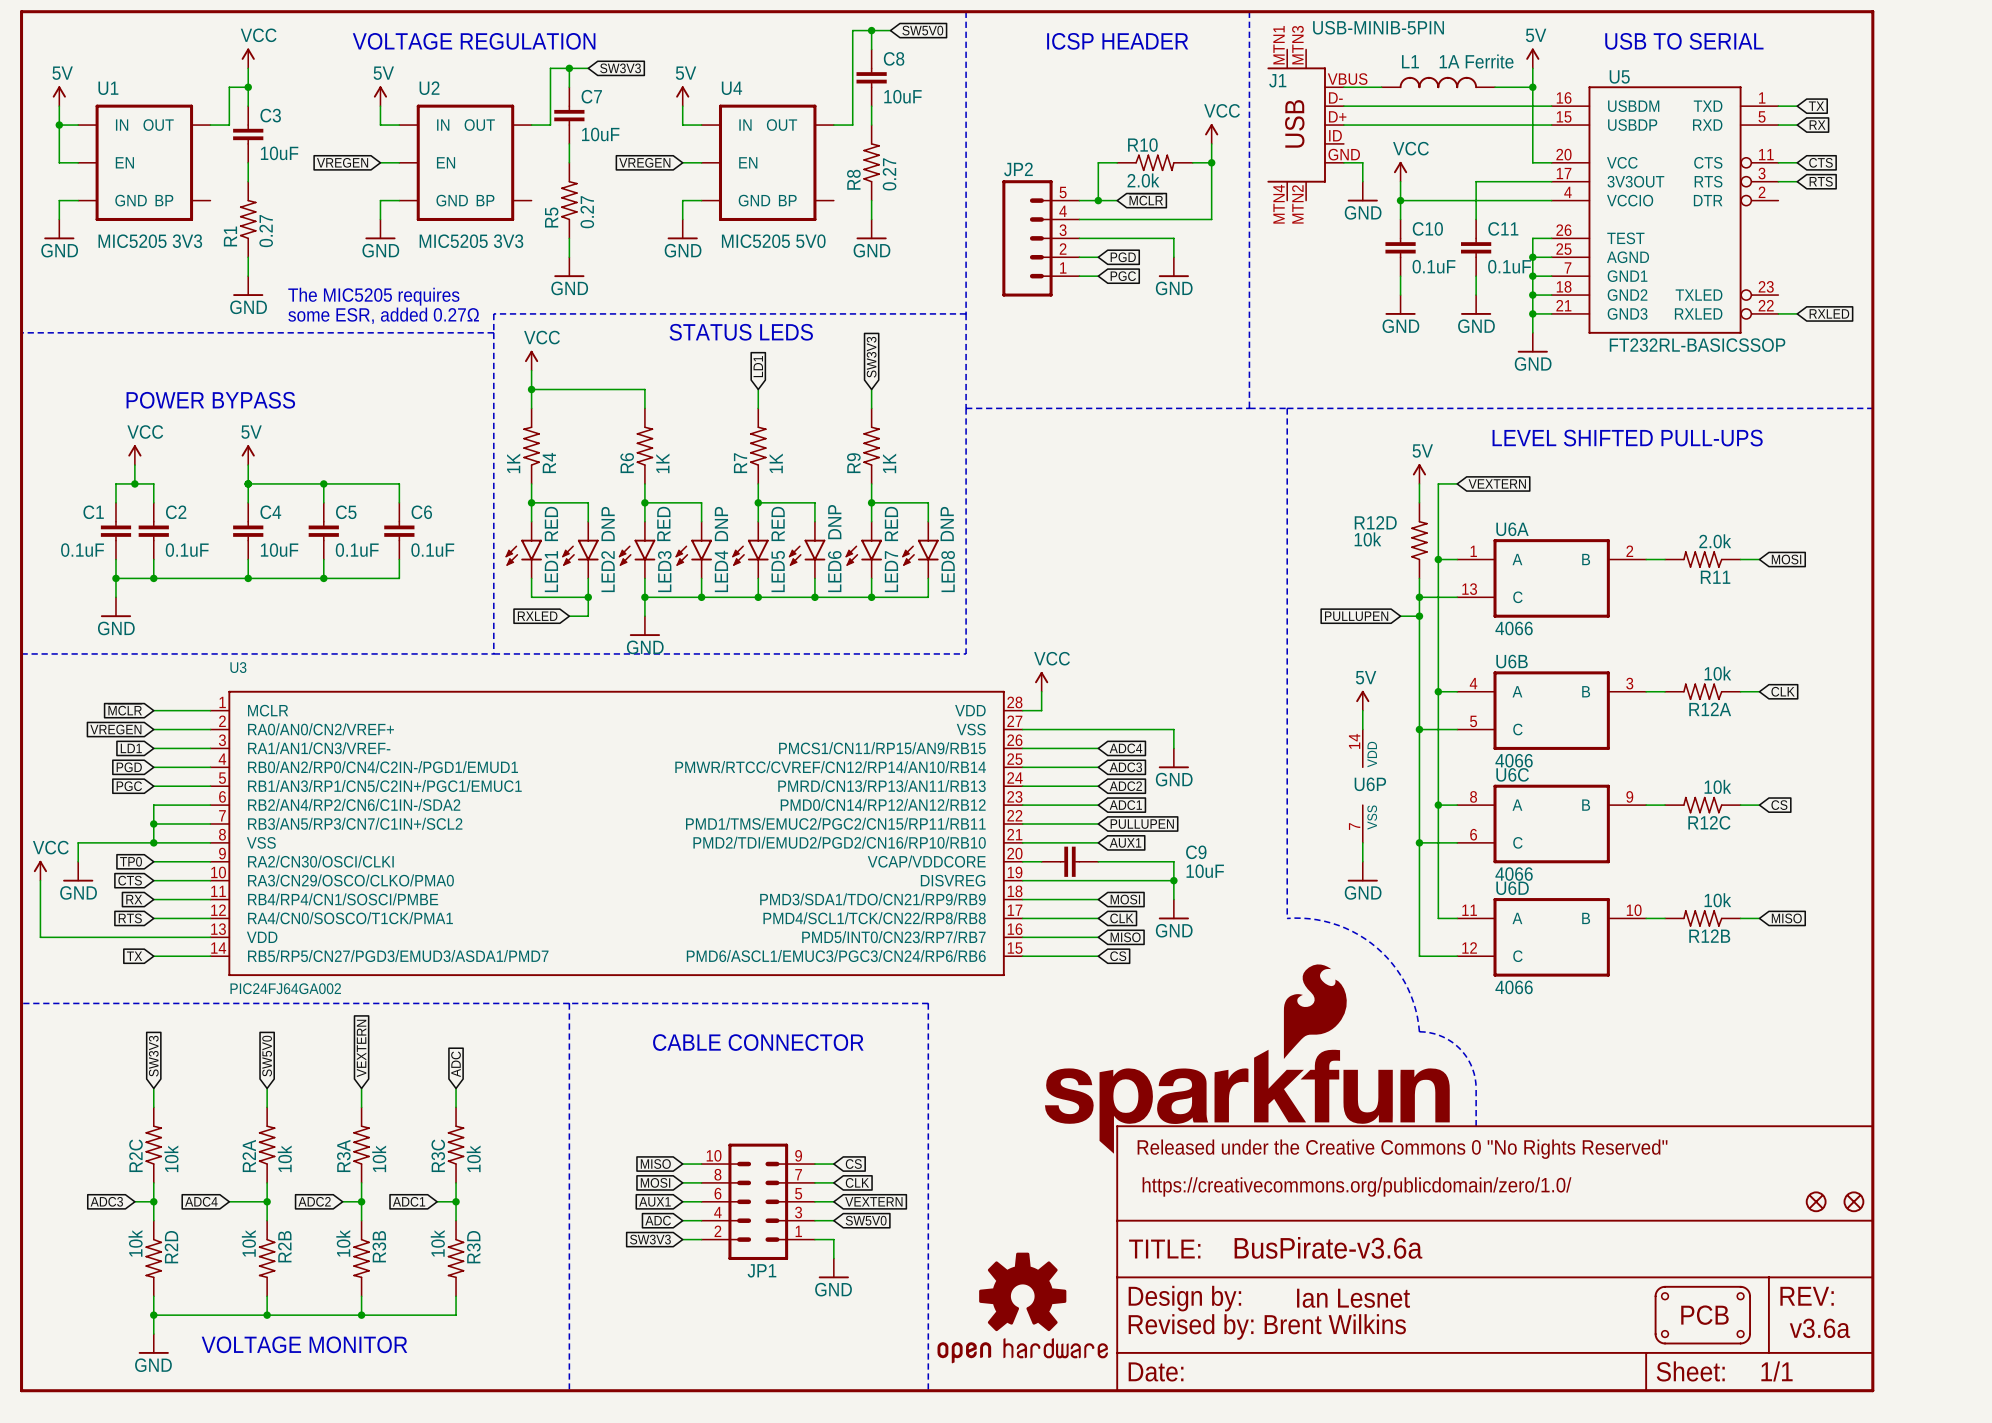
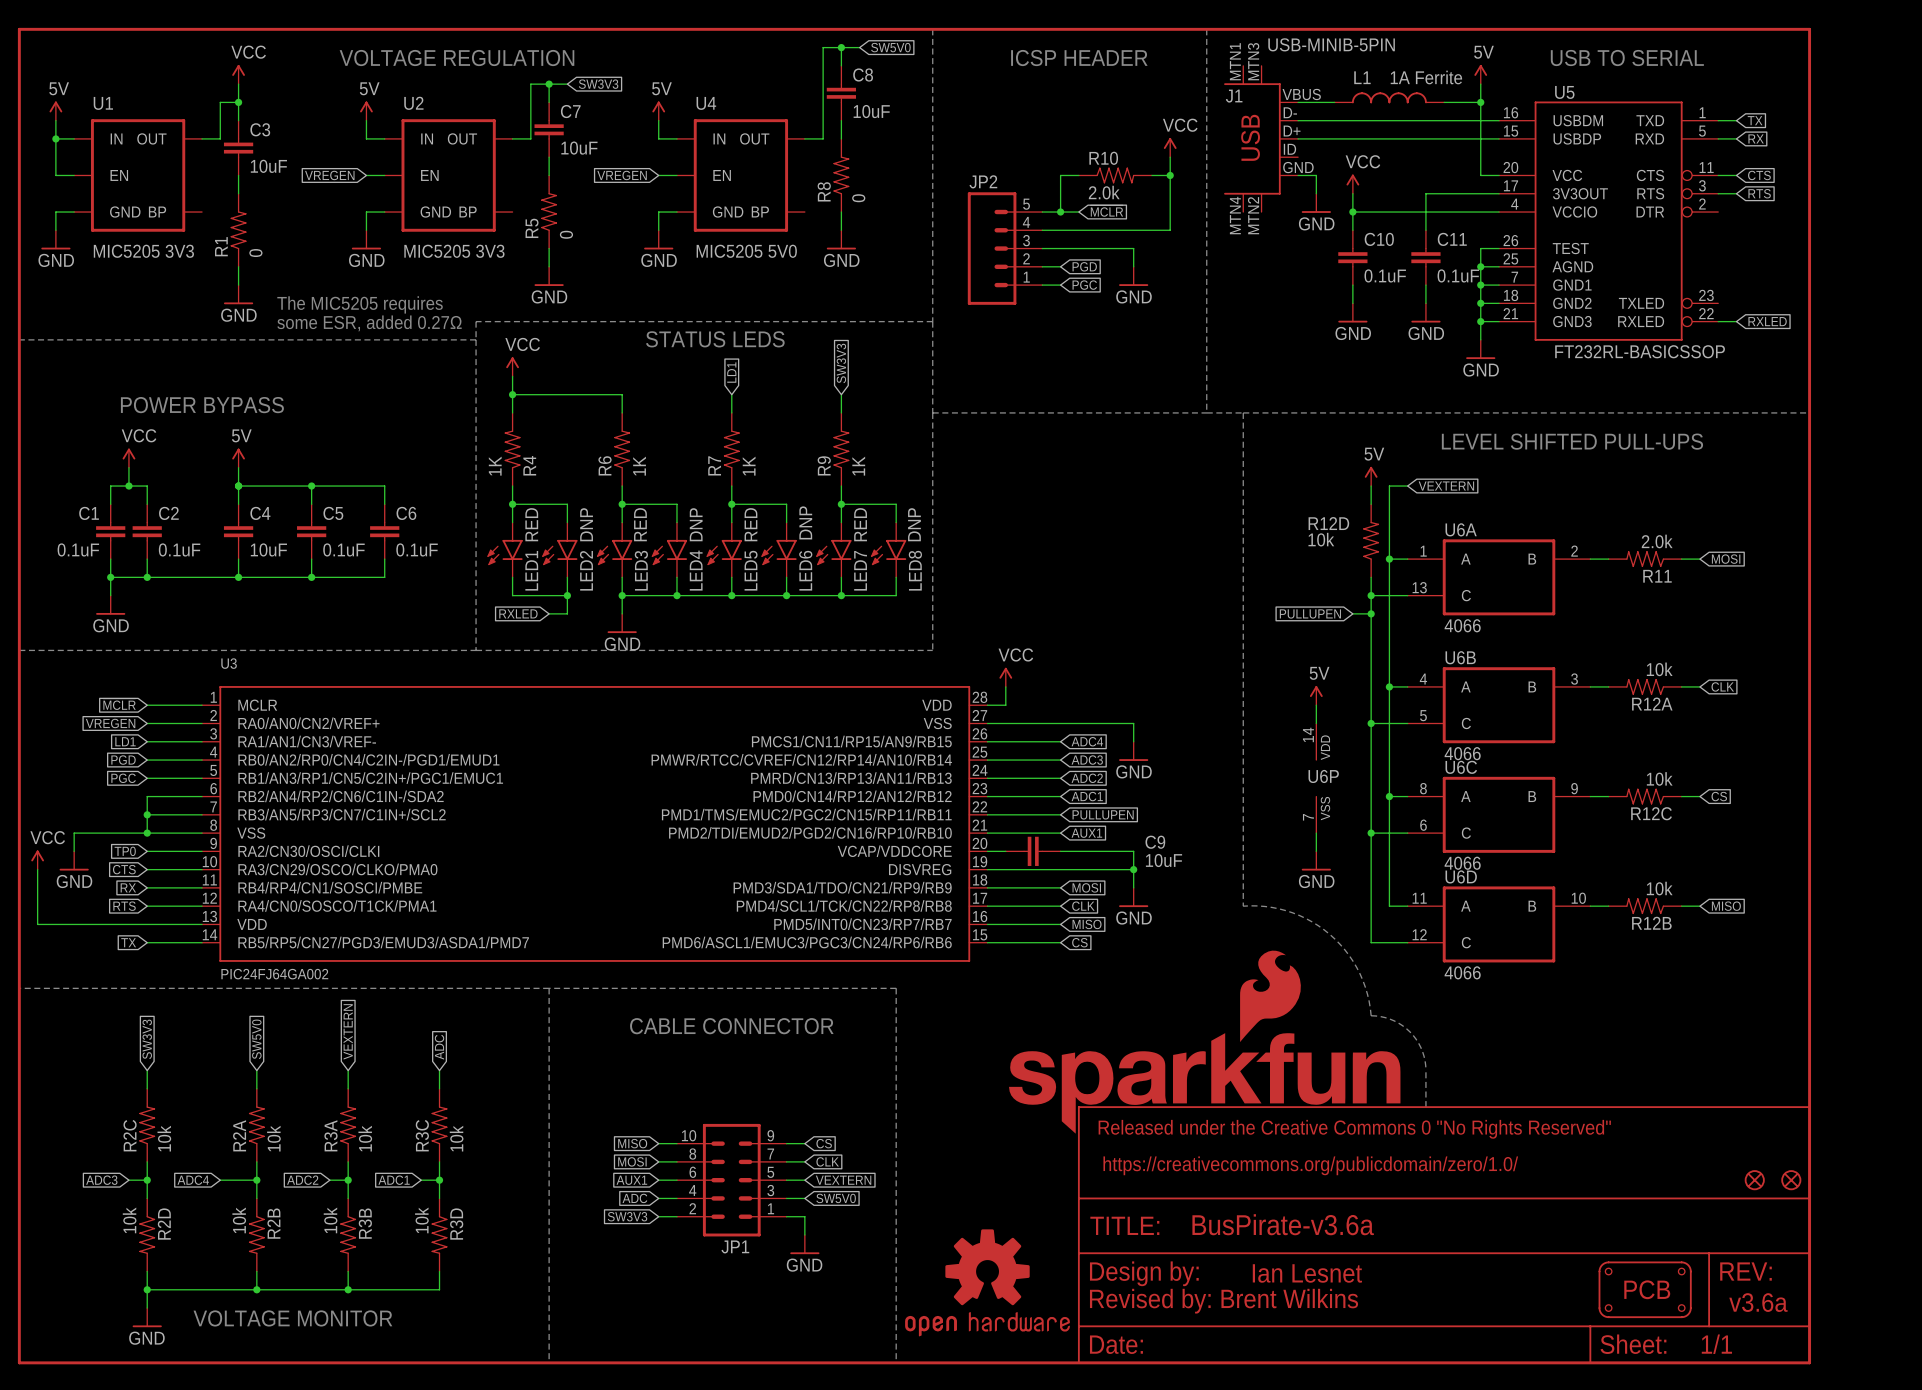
R8 value: 0.27 (889, 174) -> 0 (858, 198)
R5 value: 0.27 (587, 212) -> 0 (566, 234)
R1 value: 0.27 (266, 231) -> 0 (255, 253)

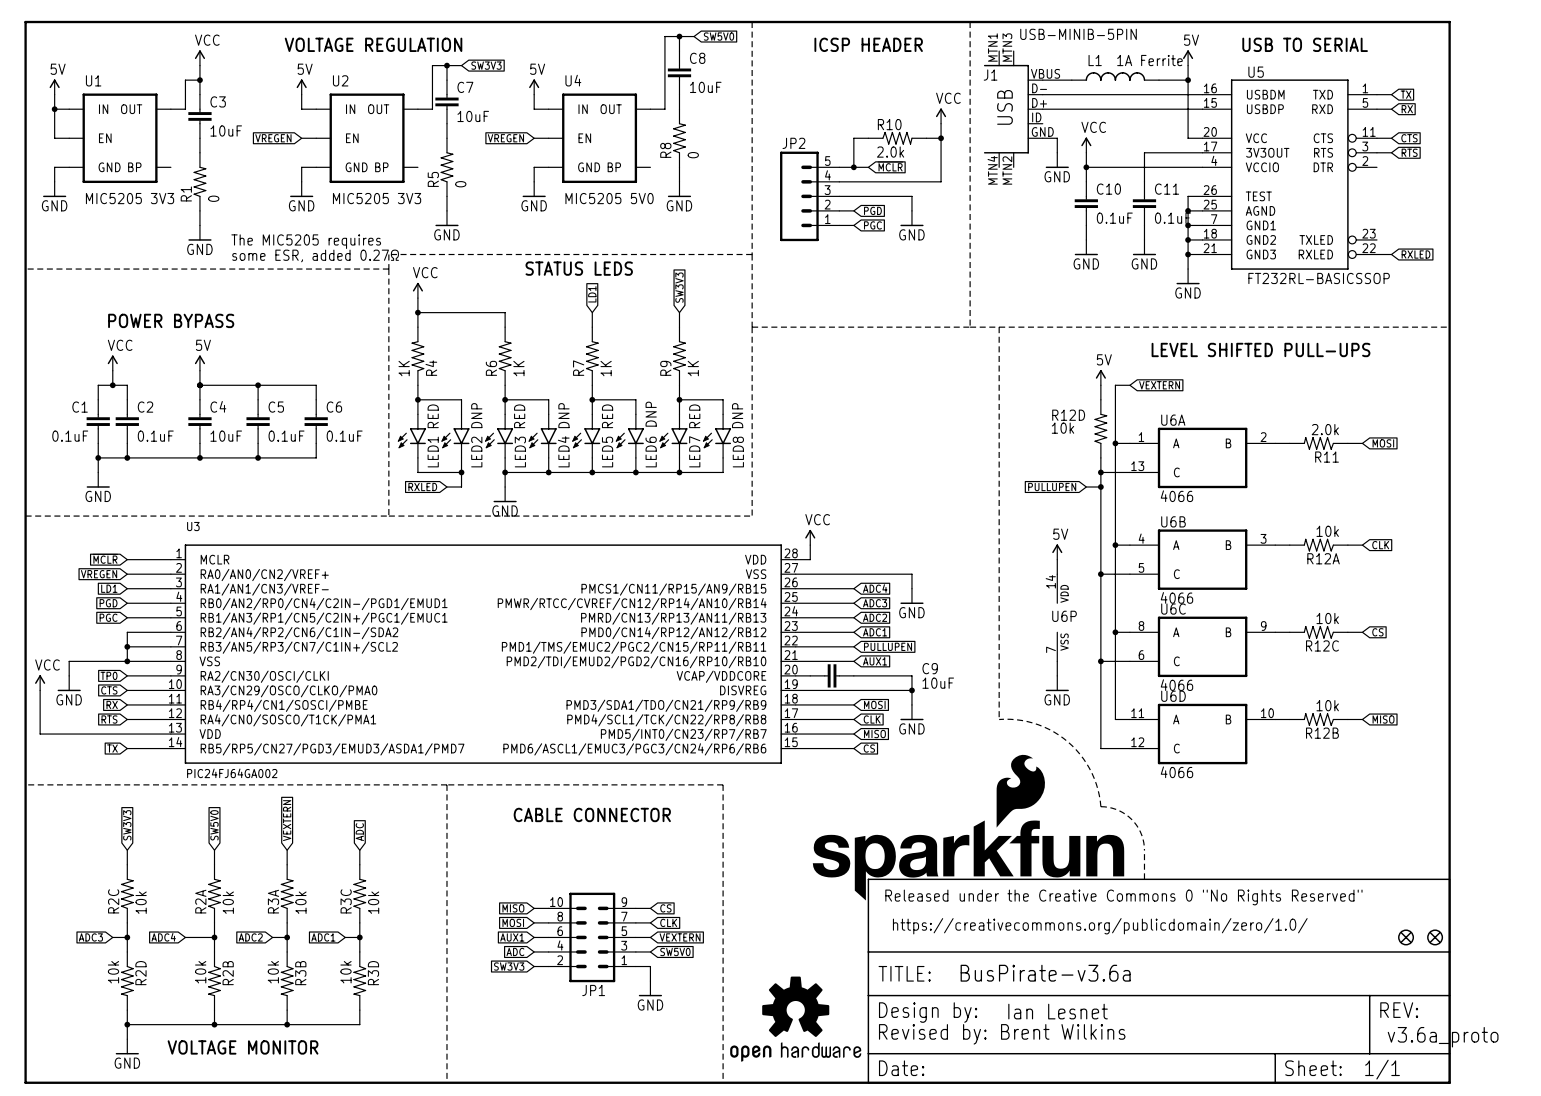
part: (1645, 1289) -> none
text: v3.6a (1758, 1302) -> v3.6a_proto (1443, 1037)

